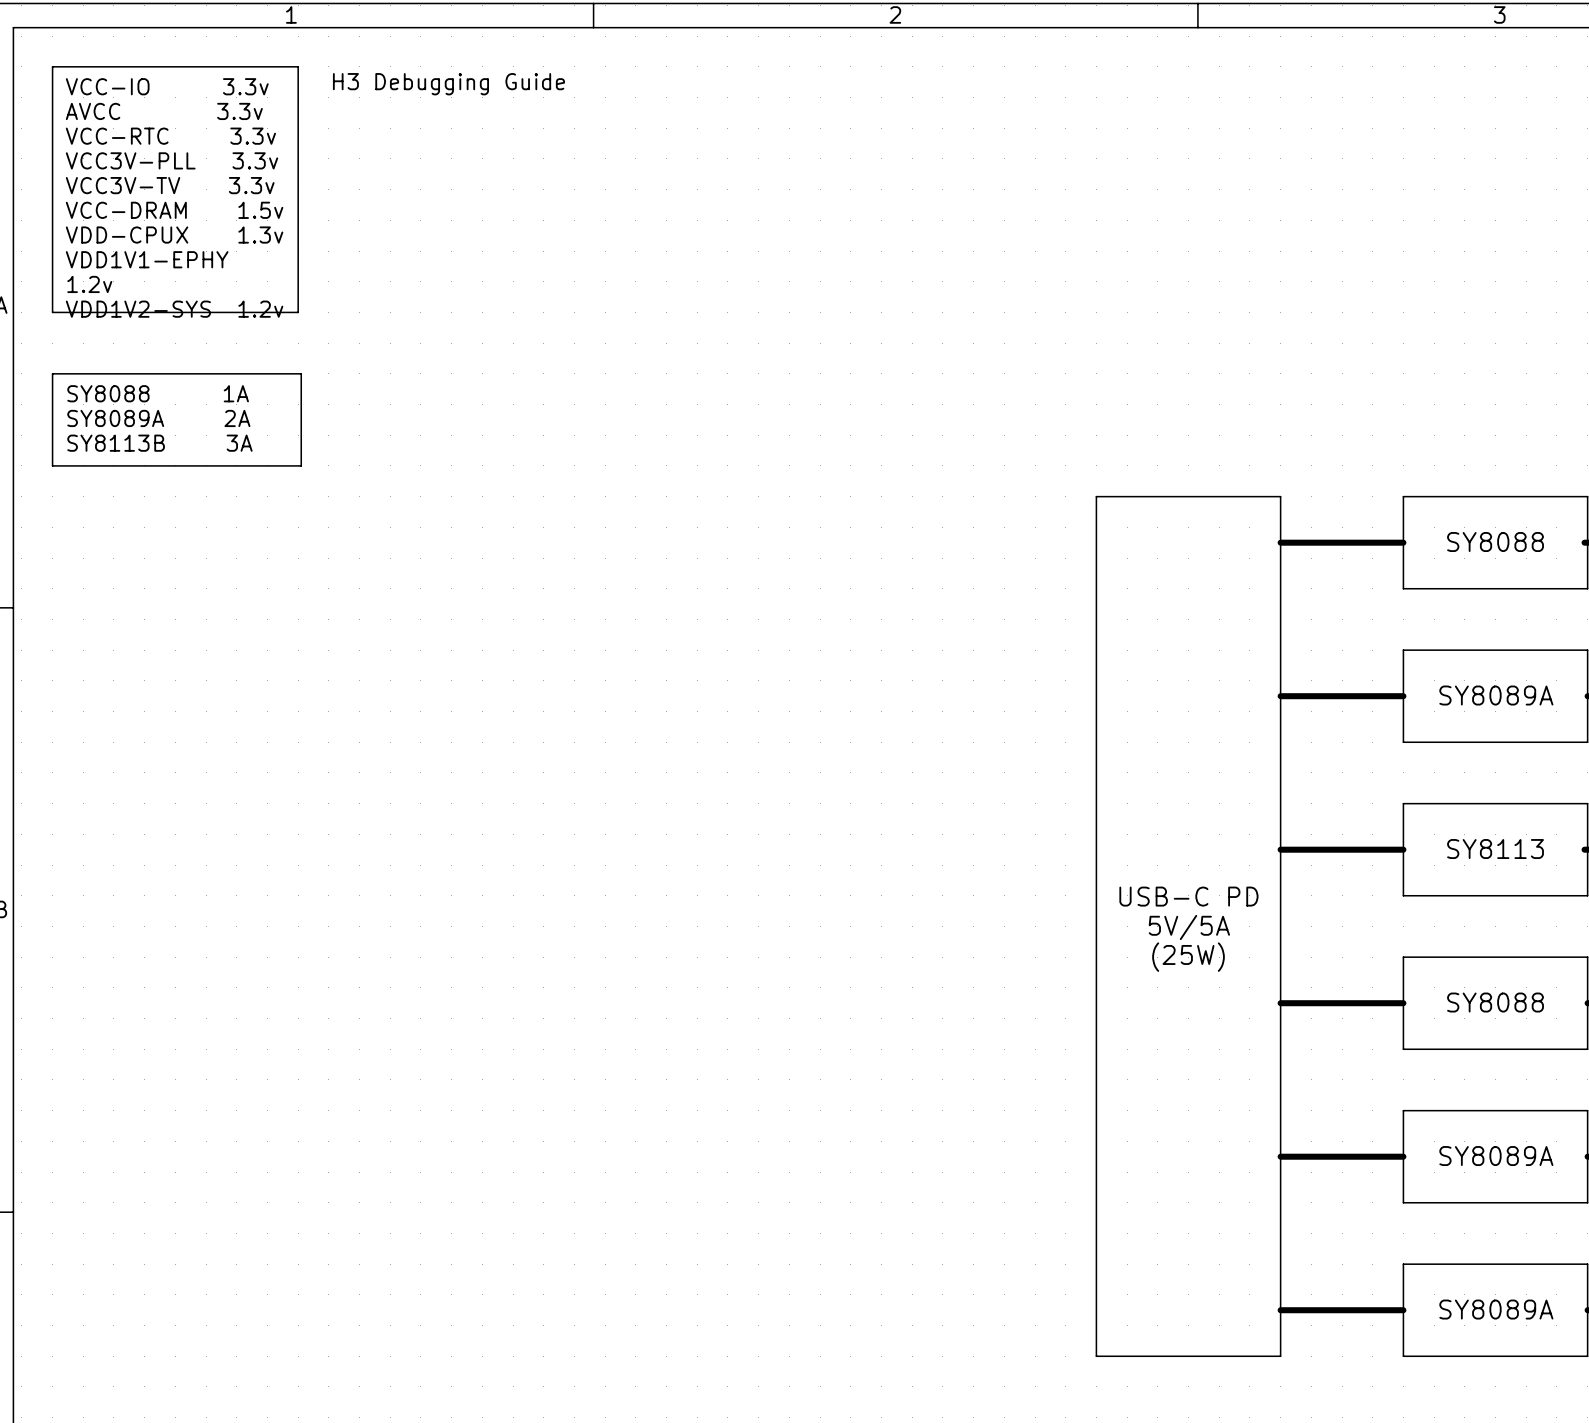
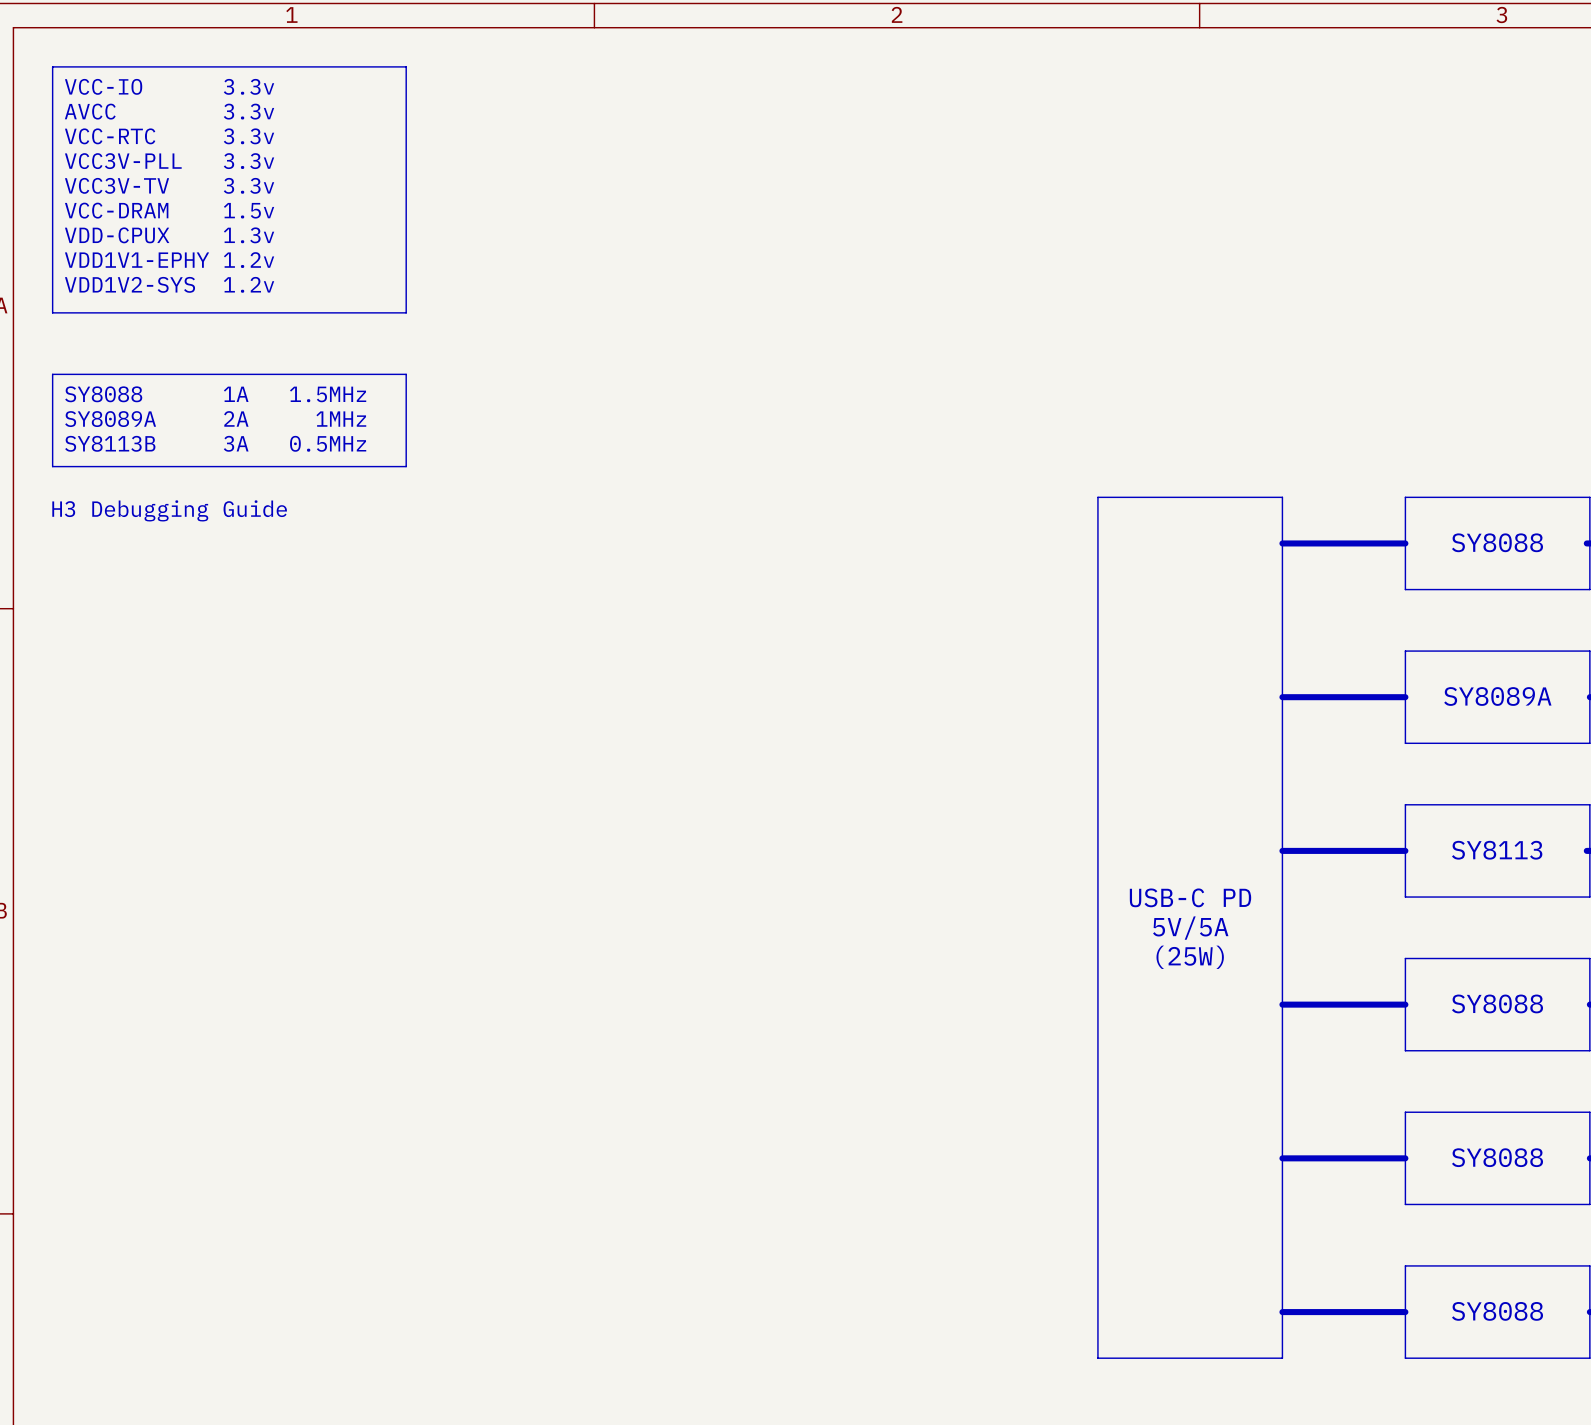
line: (298, 66) (298, 312) -> (298, 66) (406, 66) (406, 312) (298, 312)
text: H3 Debugging Guide (448, 84) -> none
text: VDD1V1-EPHY (147, 259) -> VDD1V1-EPHY 1.2v (169, 260)
text: 1.2v (89, 284) -> VDD1V2-SYS 1.2v (169, 284)
text: VDD1V2-SYS 1.2v (174, 309) -> none
line: (301, 373) (301, 465) -> (301, 374) (406, 374) (406, 466) (301, 466)
text: SY8088 1A (158, 393) -> SY8088 1A 1.5MHz (215, 394)
text: SY8089A 2A (158, 418) -> SY8089A 2A 1MHz (215, 419)
text: SY8113B 3A (159, 443) -> SY8113B 3A 0.5MHz (215, 443)
text: none -> H3 Debugging Guide (169, 510)
text: SY8089A (1496, 1156) -> SY8088 (1497, 1157)
text: SY8089A (1496, 1309) -> SY8088 (1497, 1311)

